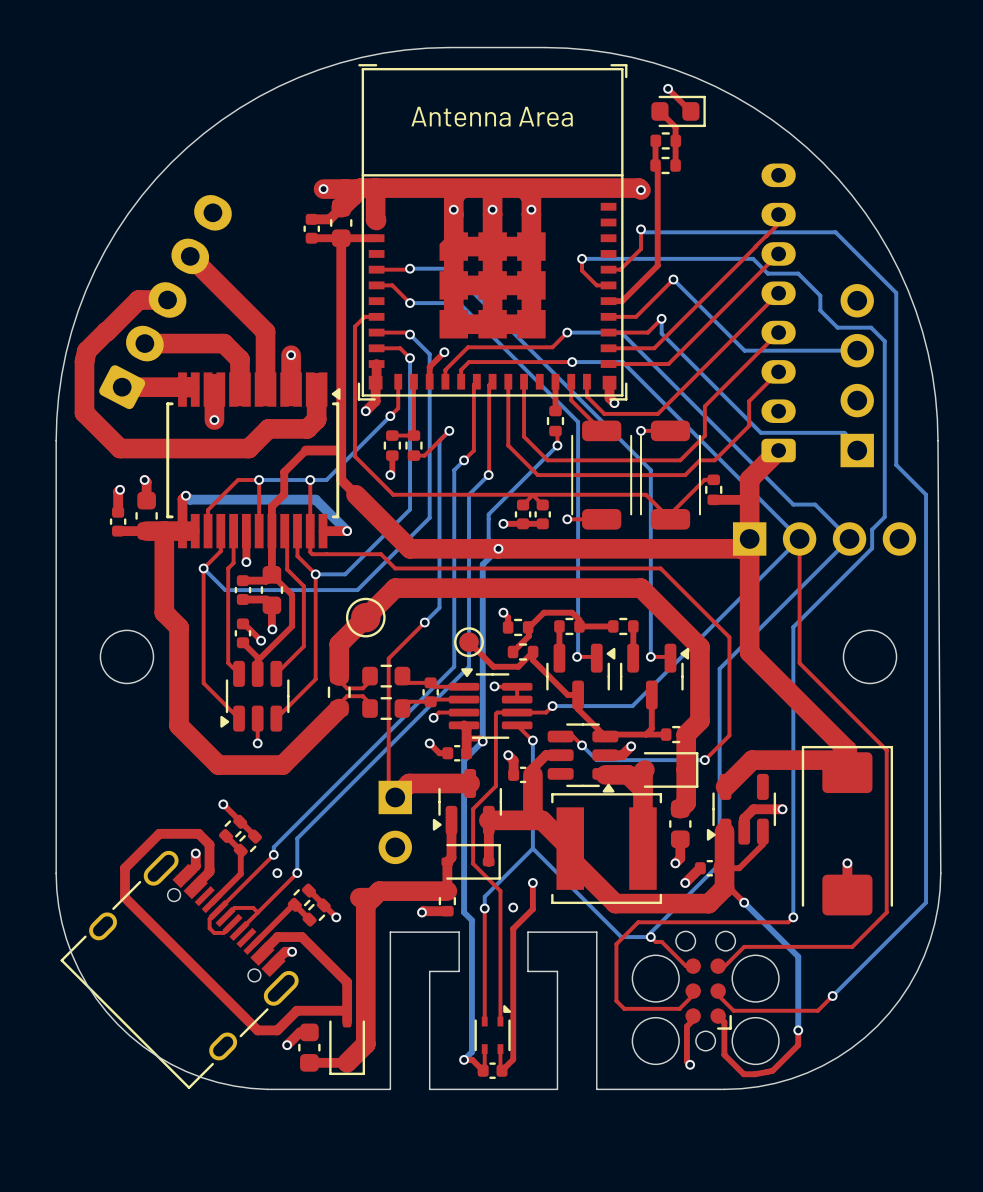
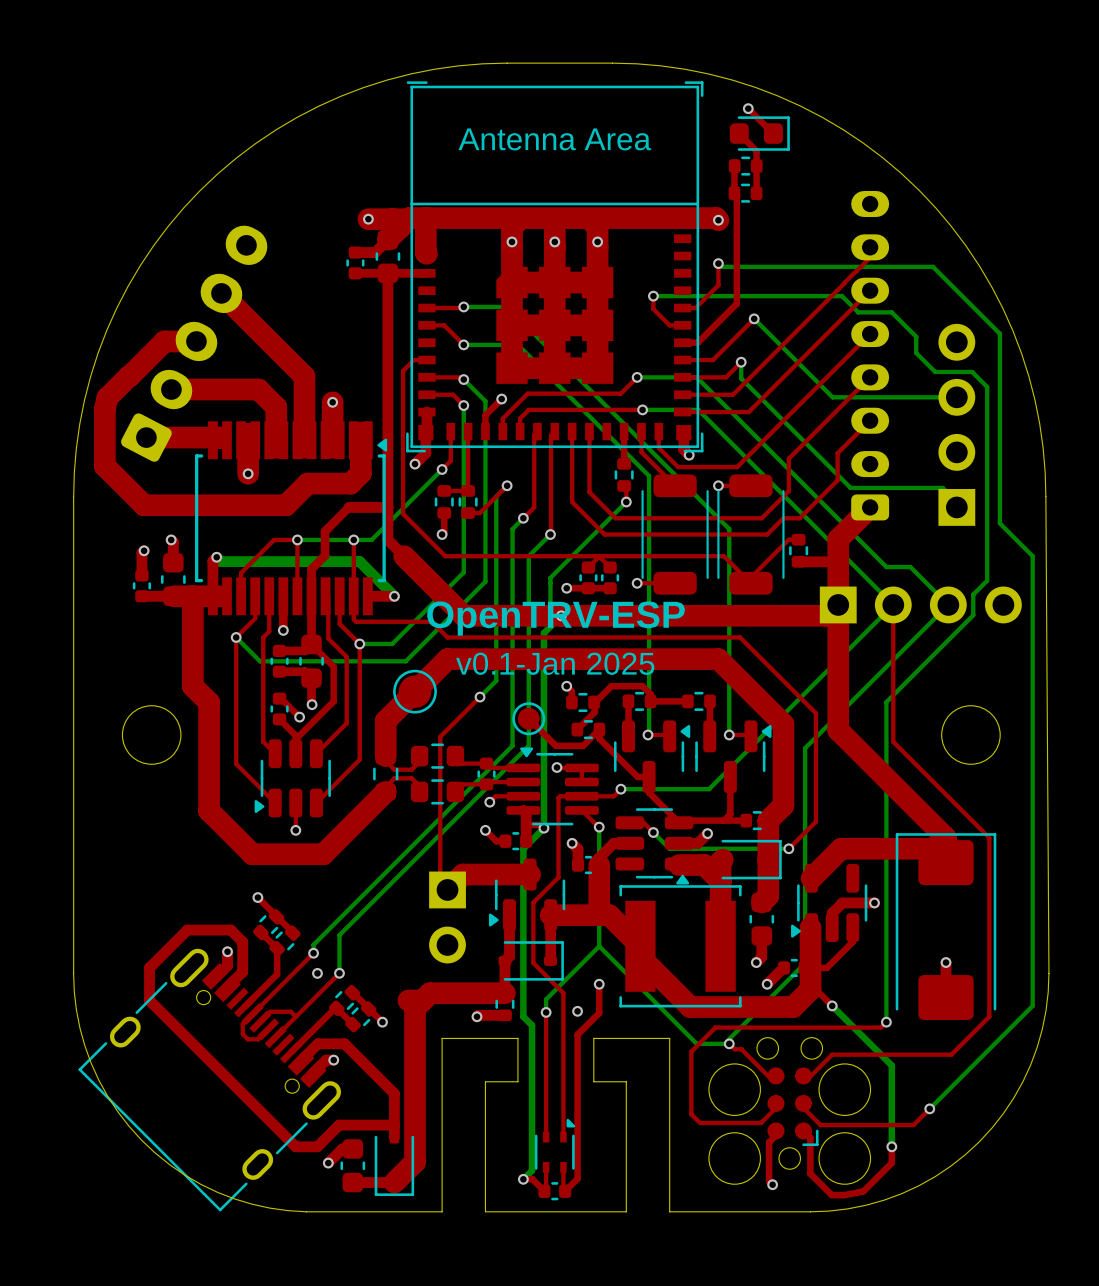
text: none -> OpenTRV-ESP (556, 618)
text: none -> v0.1-Jan 2025 (555, 663)

